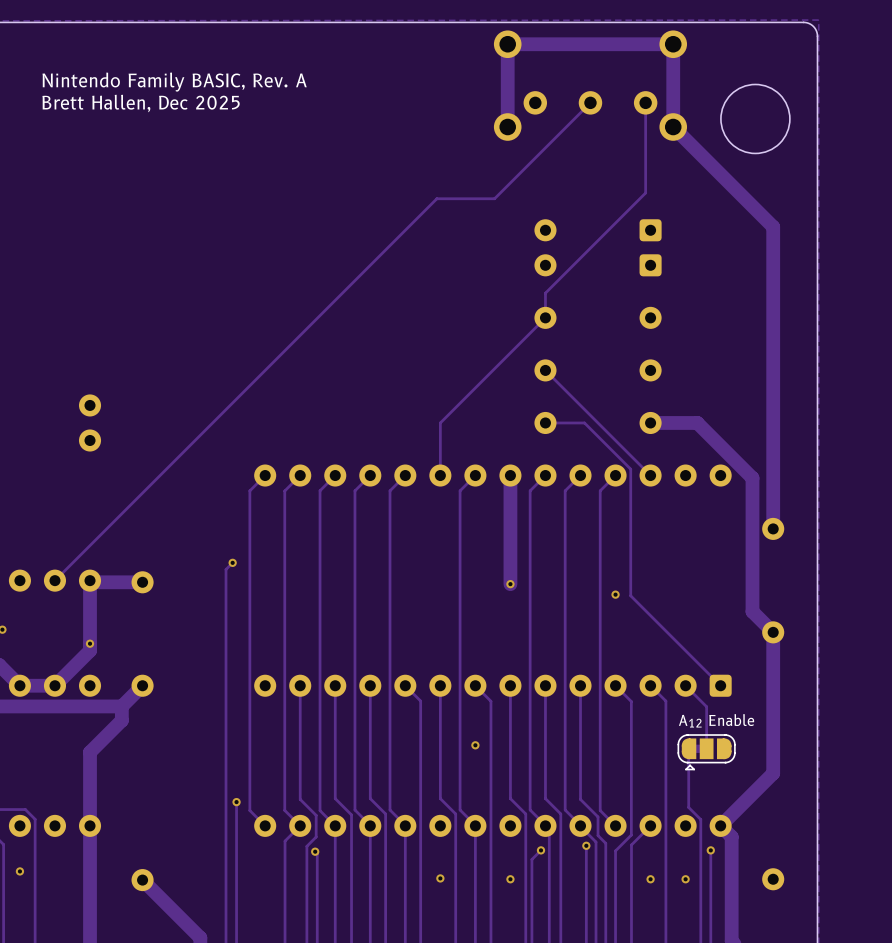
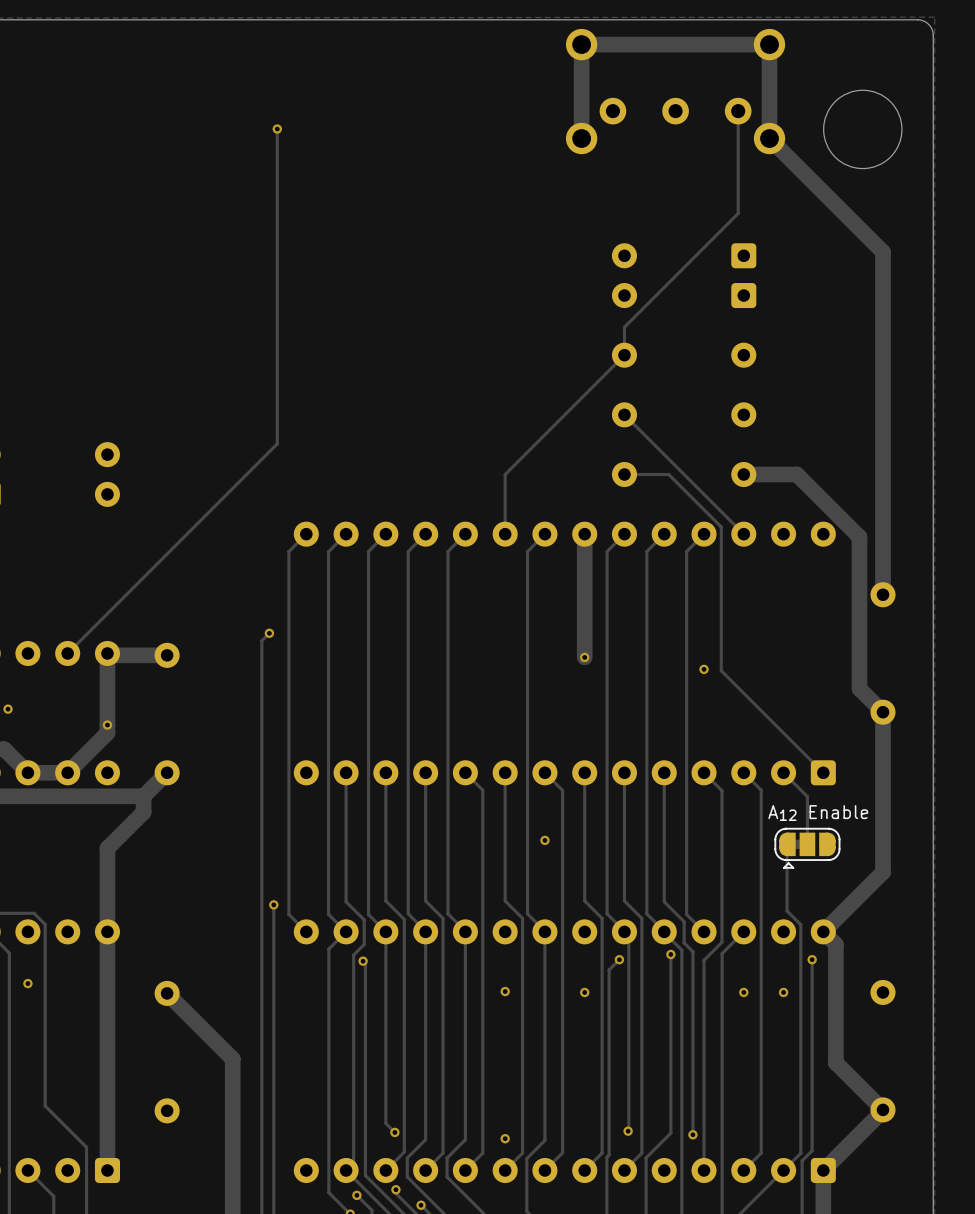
text: Nintendo Family BASIC, Rev. A (174, 82) -> none
track: (590, 102) (494, 198) (436, 198) (239, 395) -> (277, 129) (277, 443)
text: Brett Hallen, Dec 2025 (141, 103) -> none
via: none -> (277, 129)

